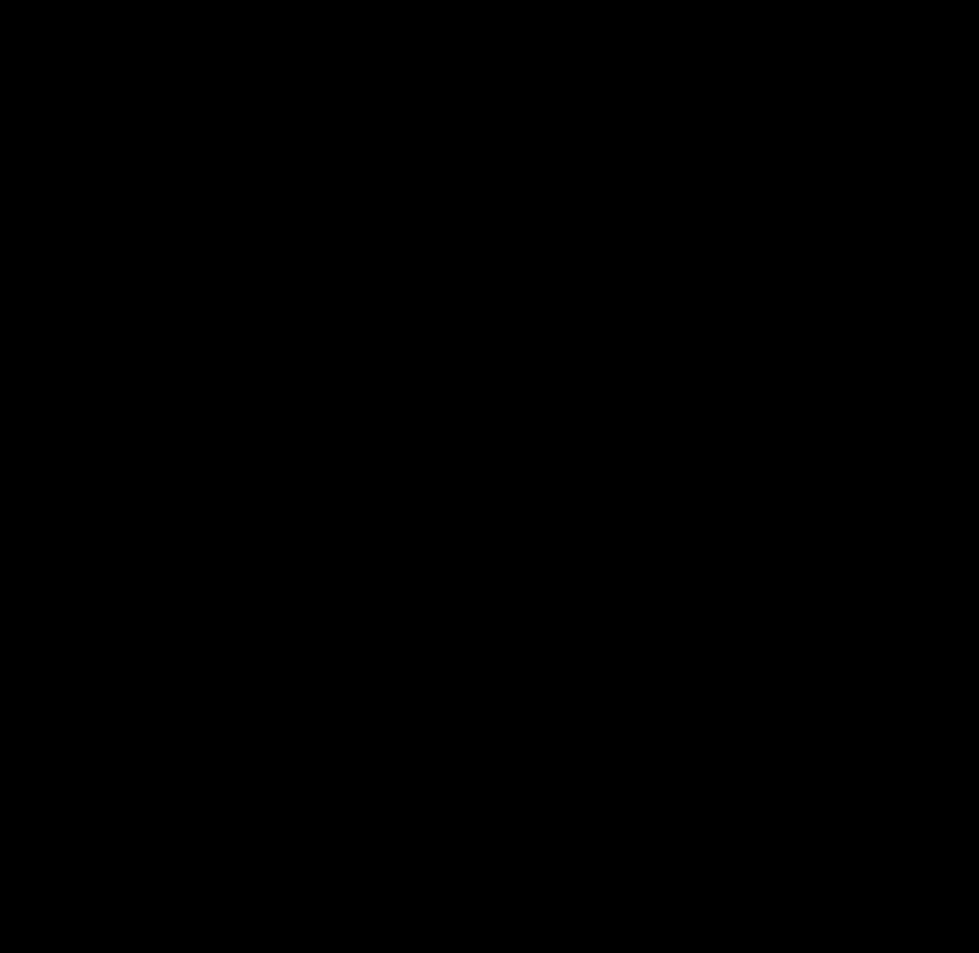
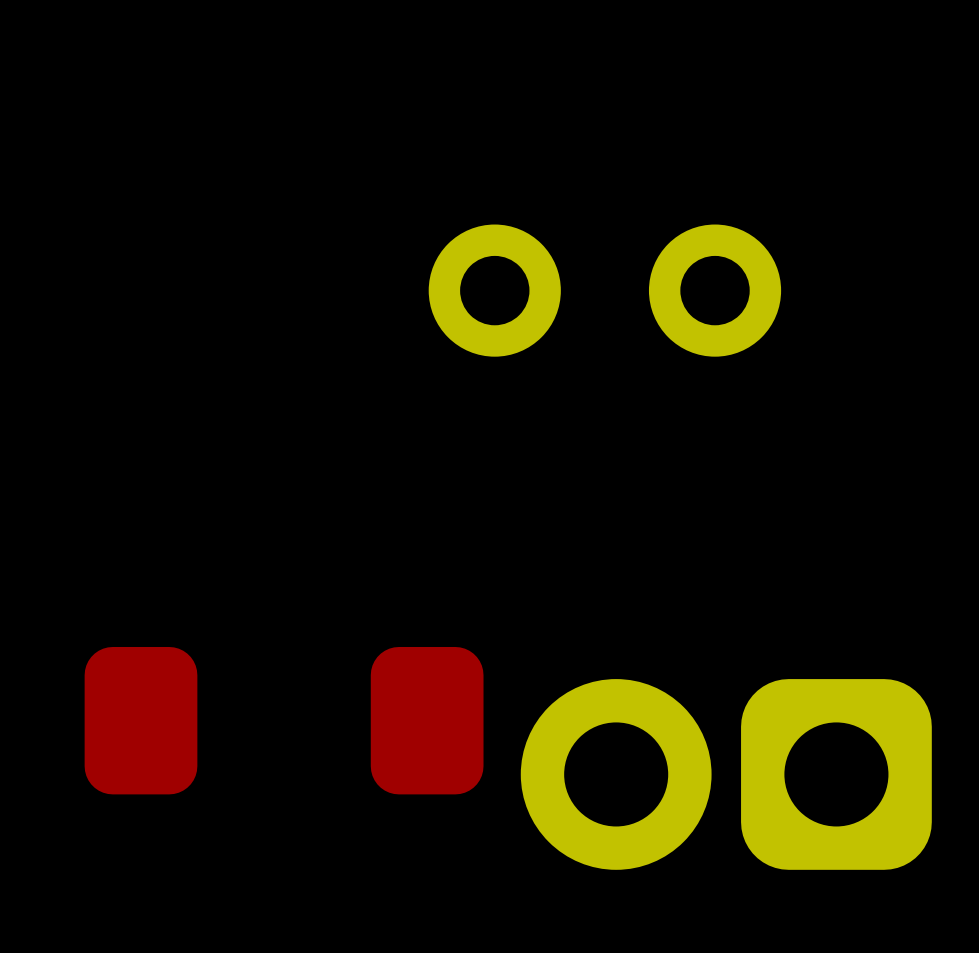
part: none -> (604, 290)
part: none -> (284, 720)
part: none -> (726, 774)

